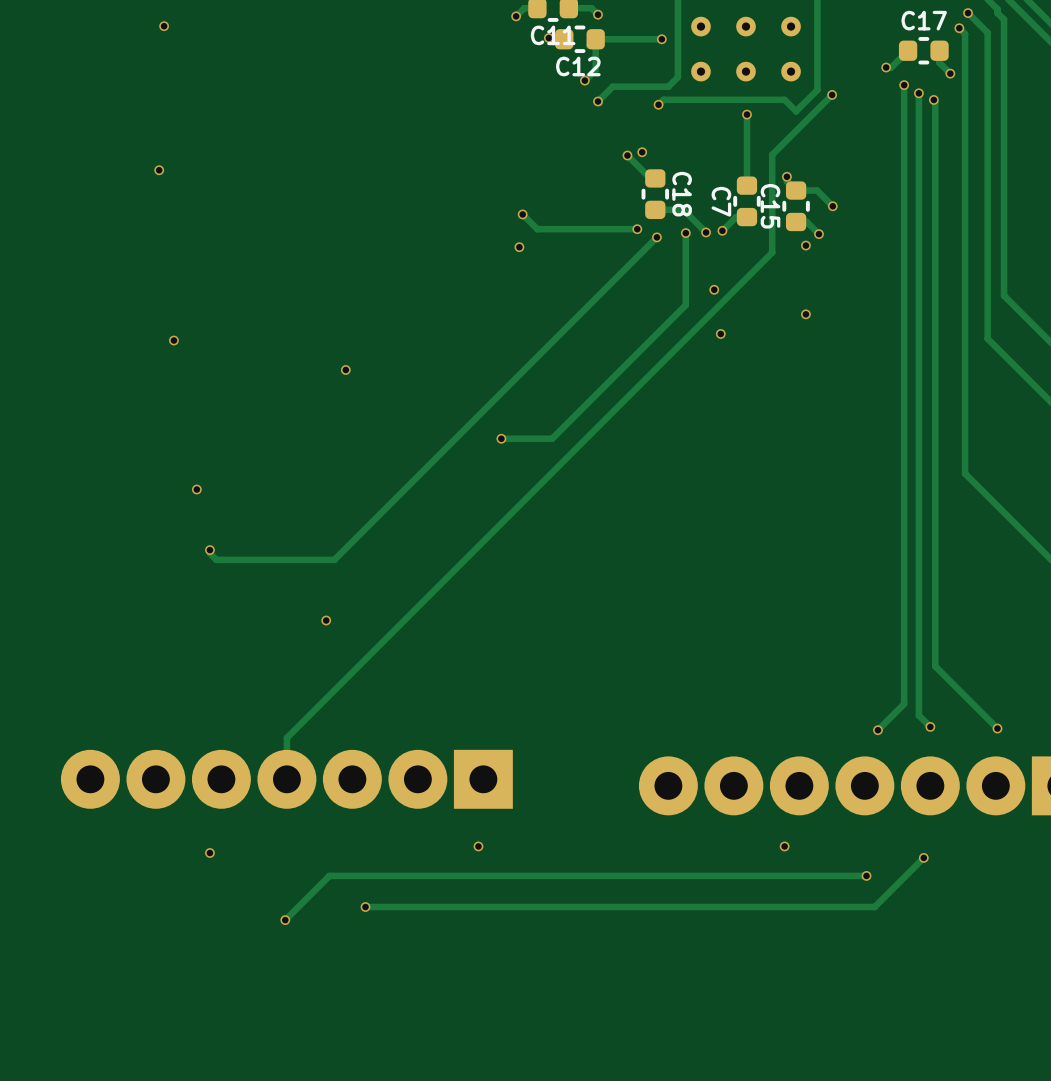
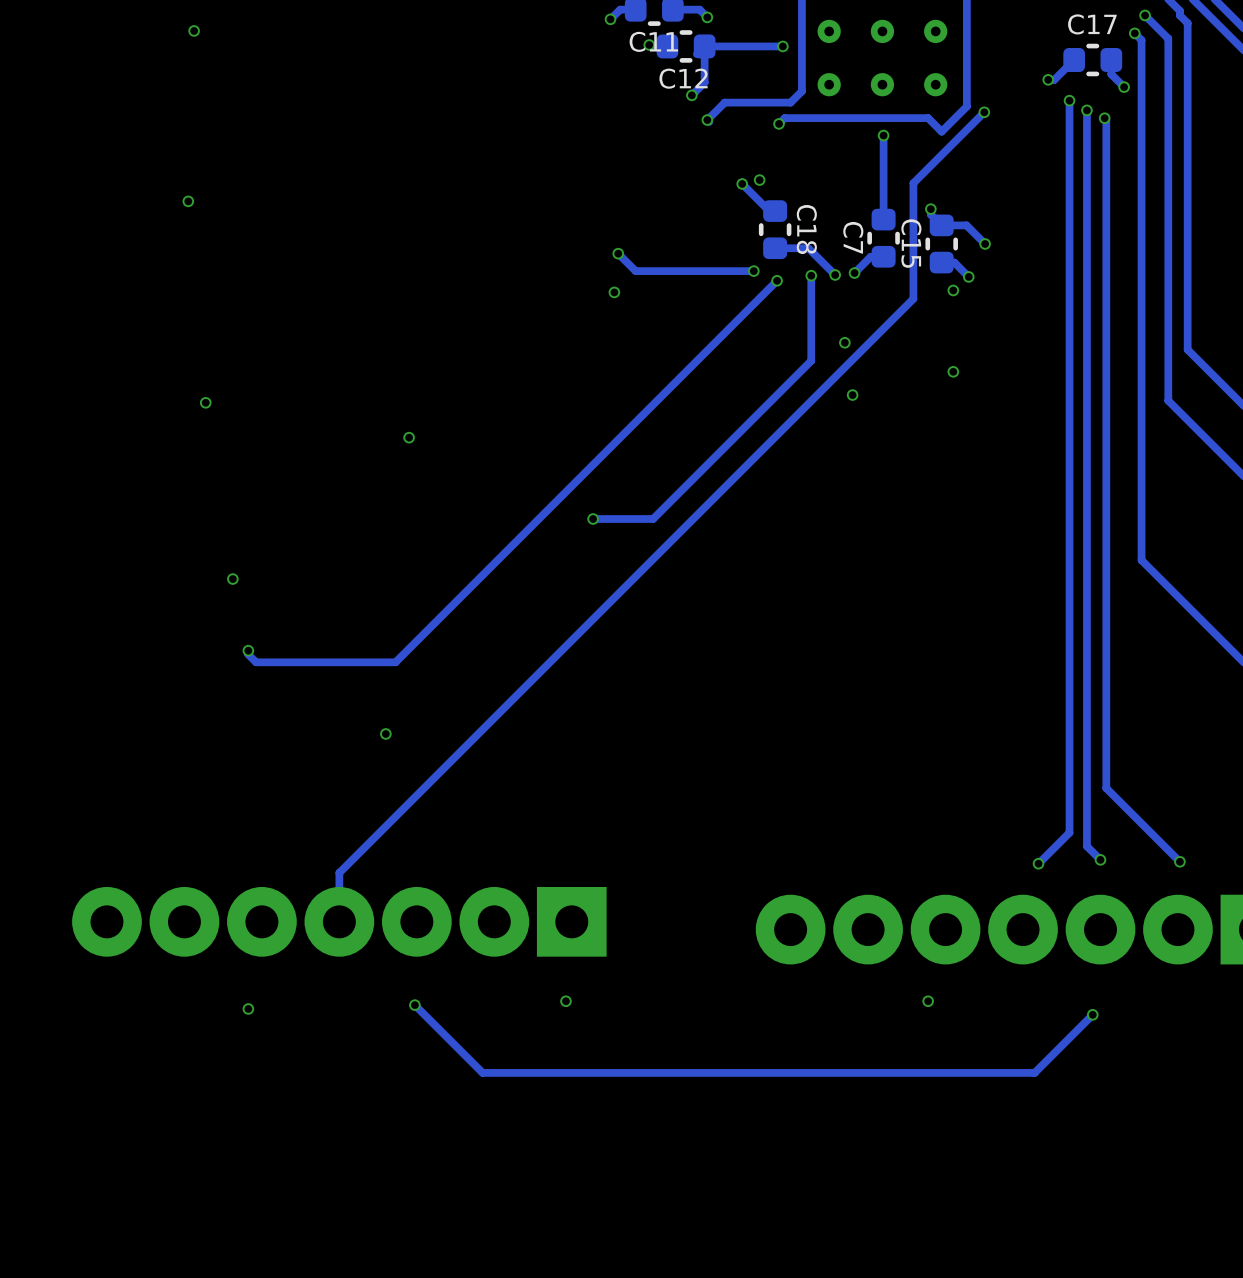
via: none -> (414, 1005)
track: (866, 875) (329, 875) (285, 920) -> none
via: (866, 875) -> none
via: (365, 907) -> none
track: (408, 907) (365, 907) -> (482, 1072) (414, 1005)
via: (285, 920) -> none

